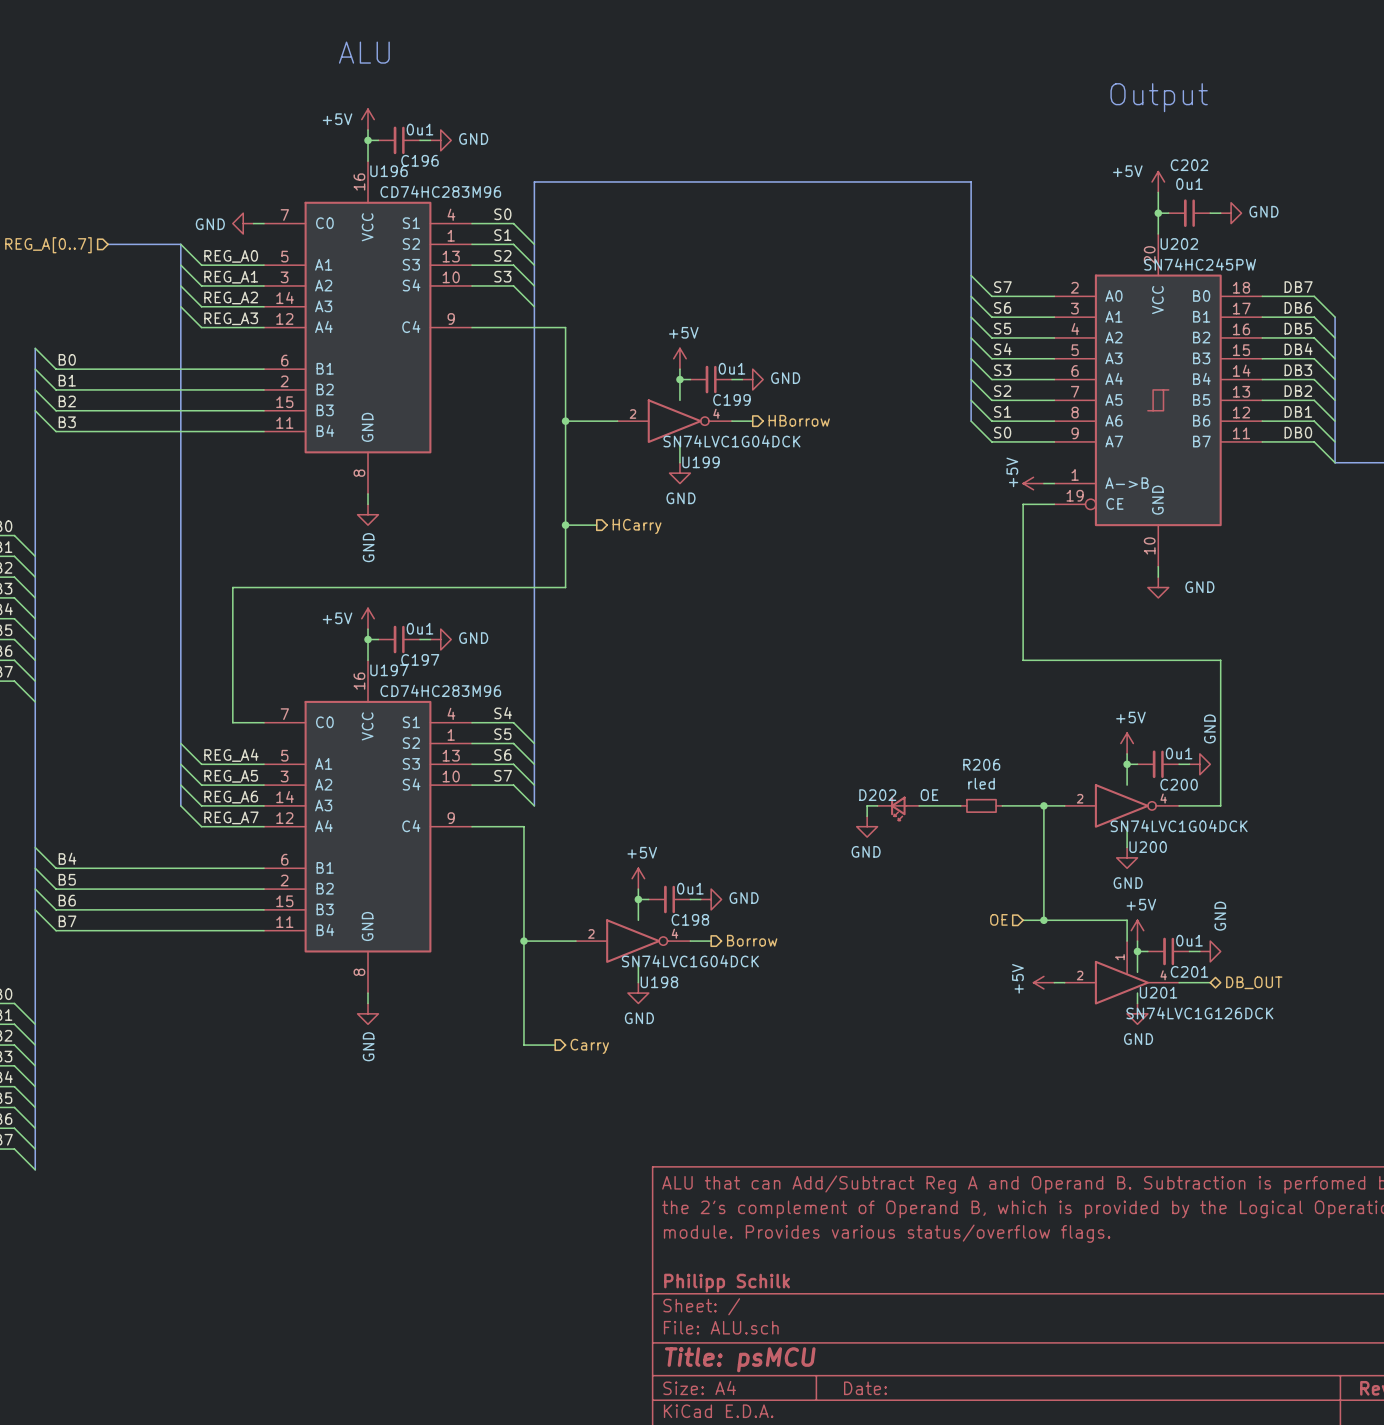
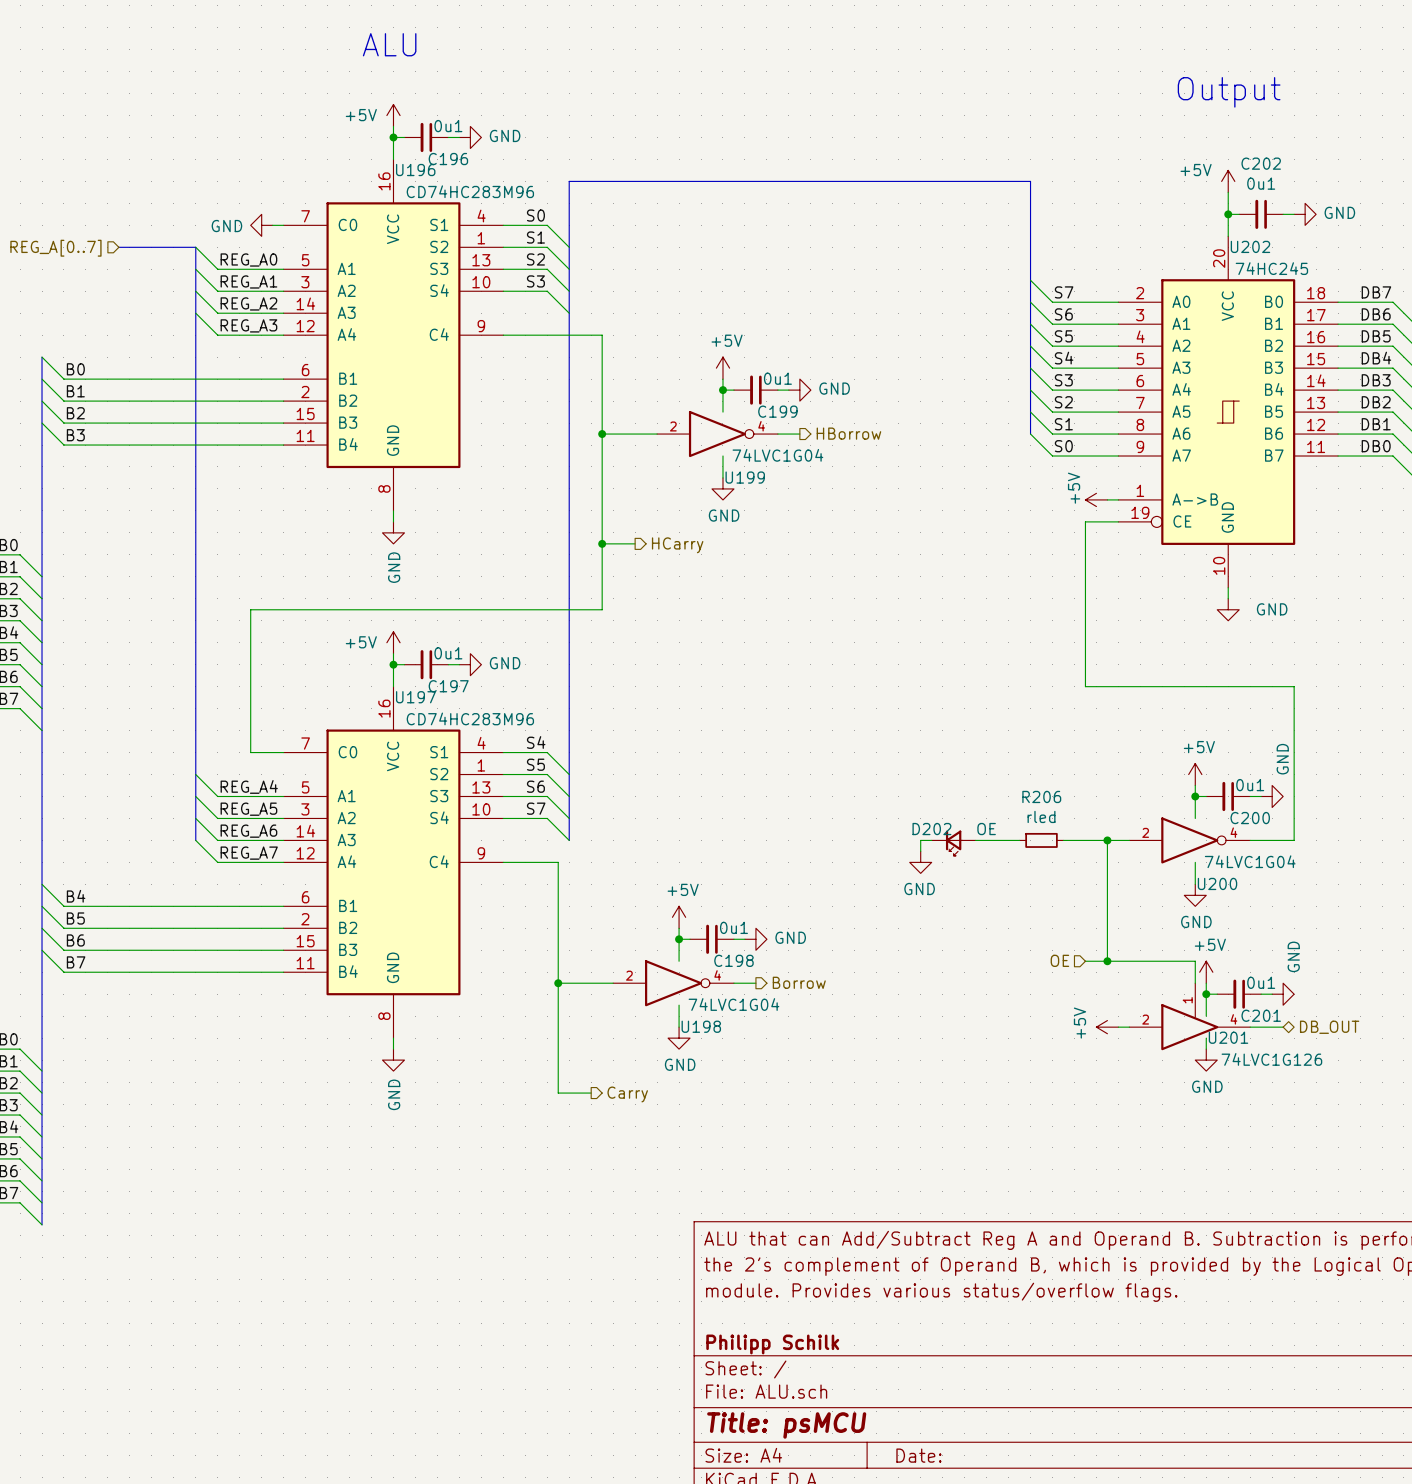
U202 value: SN74HC245PW (1200, 264) -> 74HC245 (1271, 268)
U199 value: SN74LVC1G04DCK (731, 441) -> 74LVC1G04 (777, 455)
U200 value: SN74LVC1G04DCK (1179, 826) -> 74LVC1G04 (1250, 861)
U198 value: SN74LVC1G04DCK (690, 961) -> 74LVC1G04 (733, 1004)
U201 value: SN74LVC1G126DCK (1199, 1013) -> 74LVC1G126 (1271, 1059)

